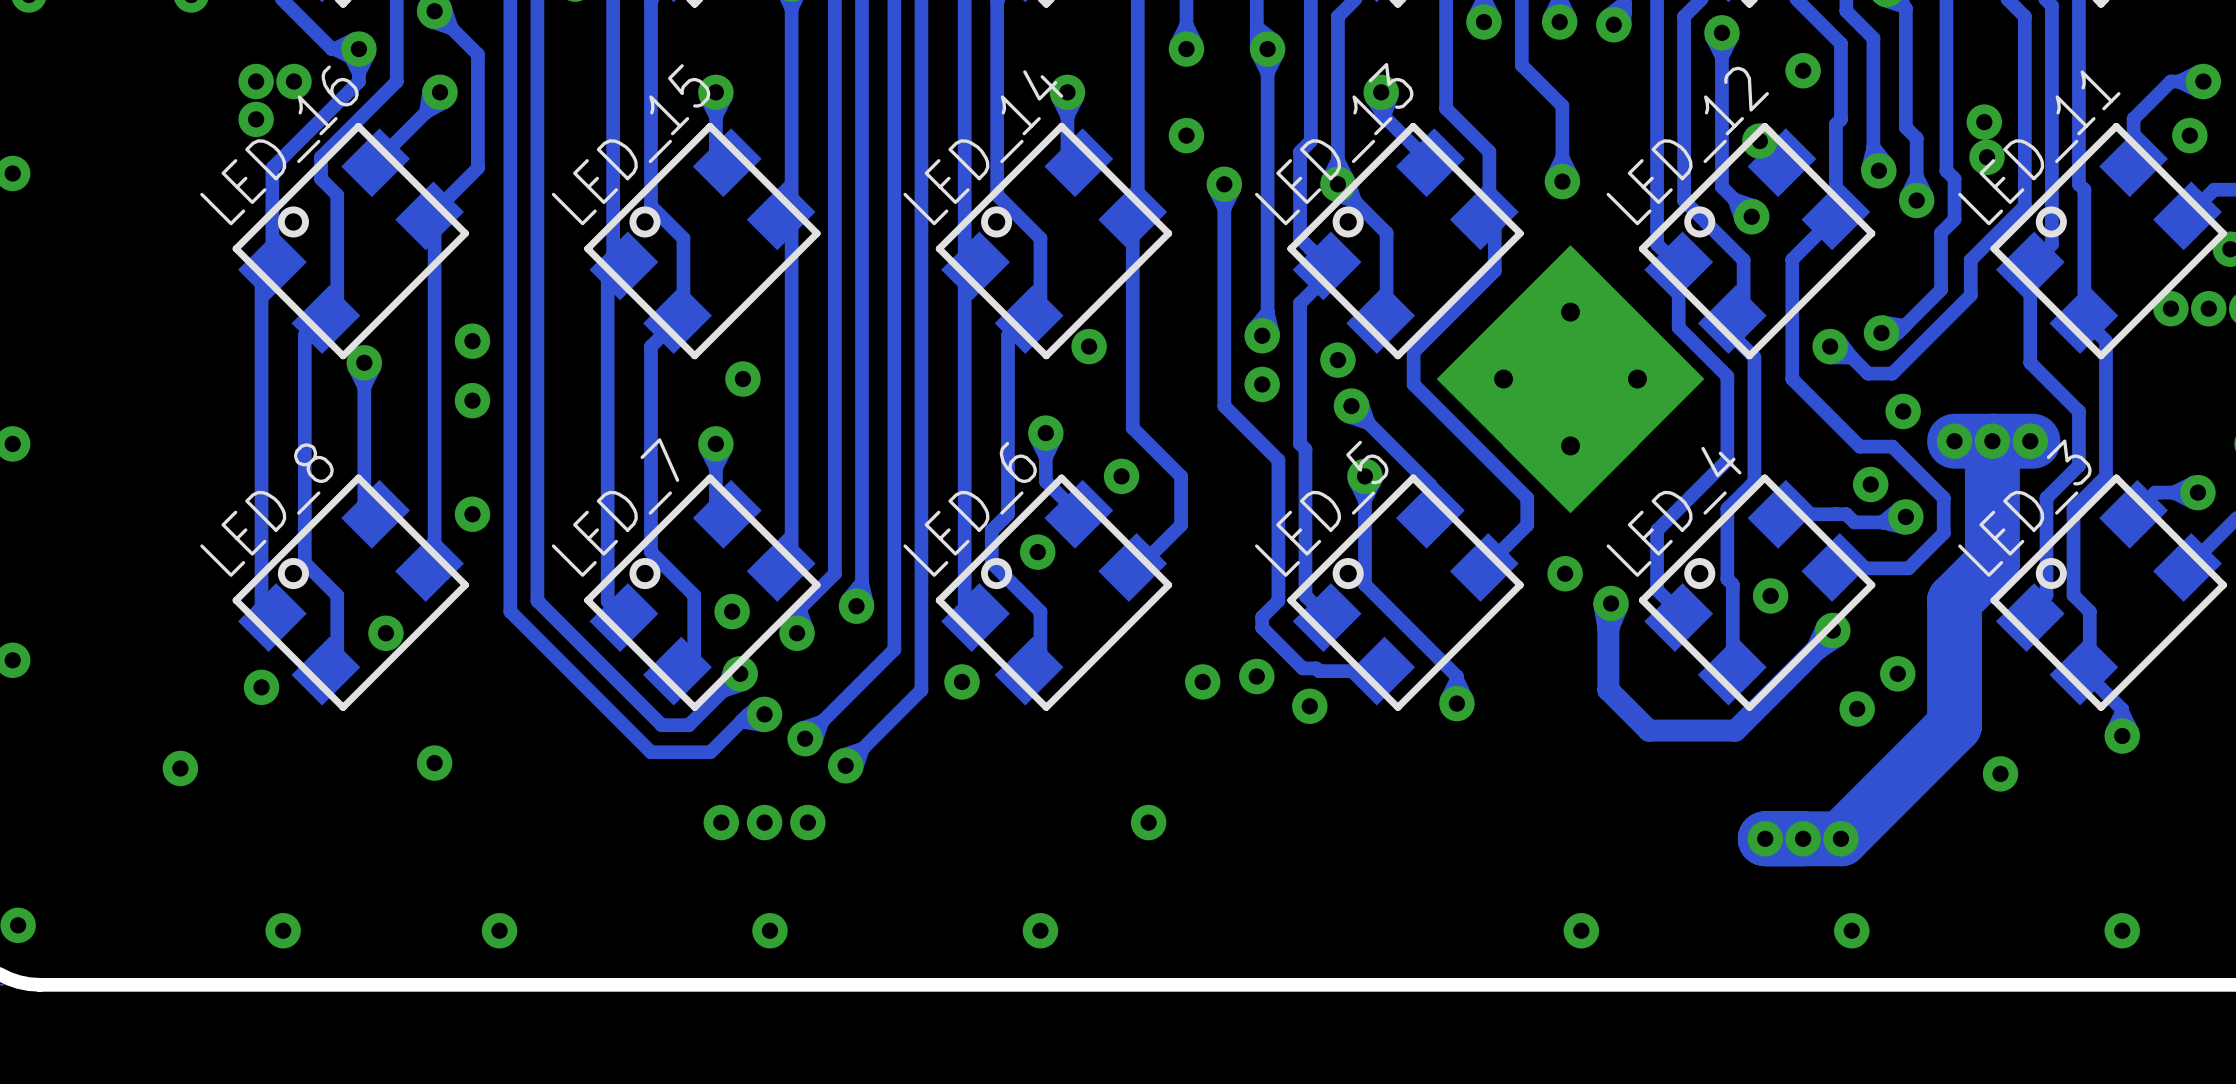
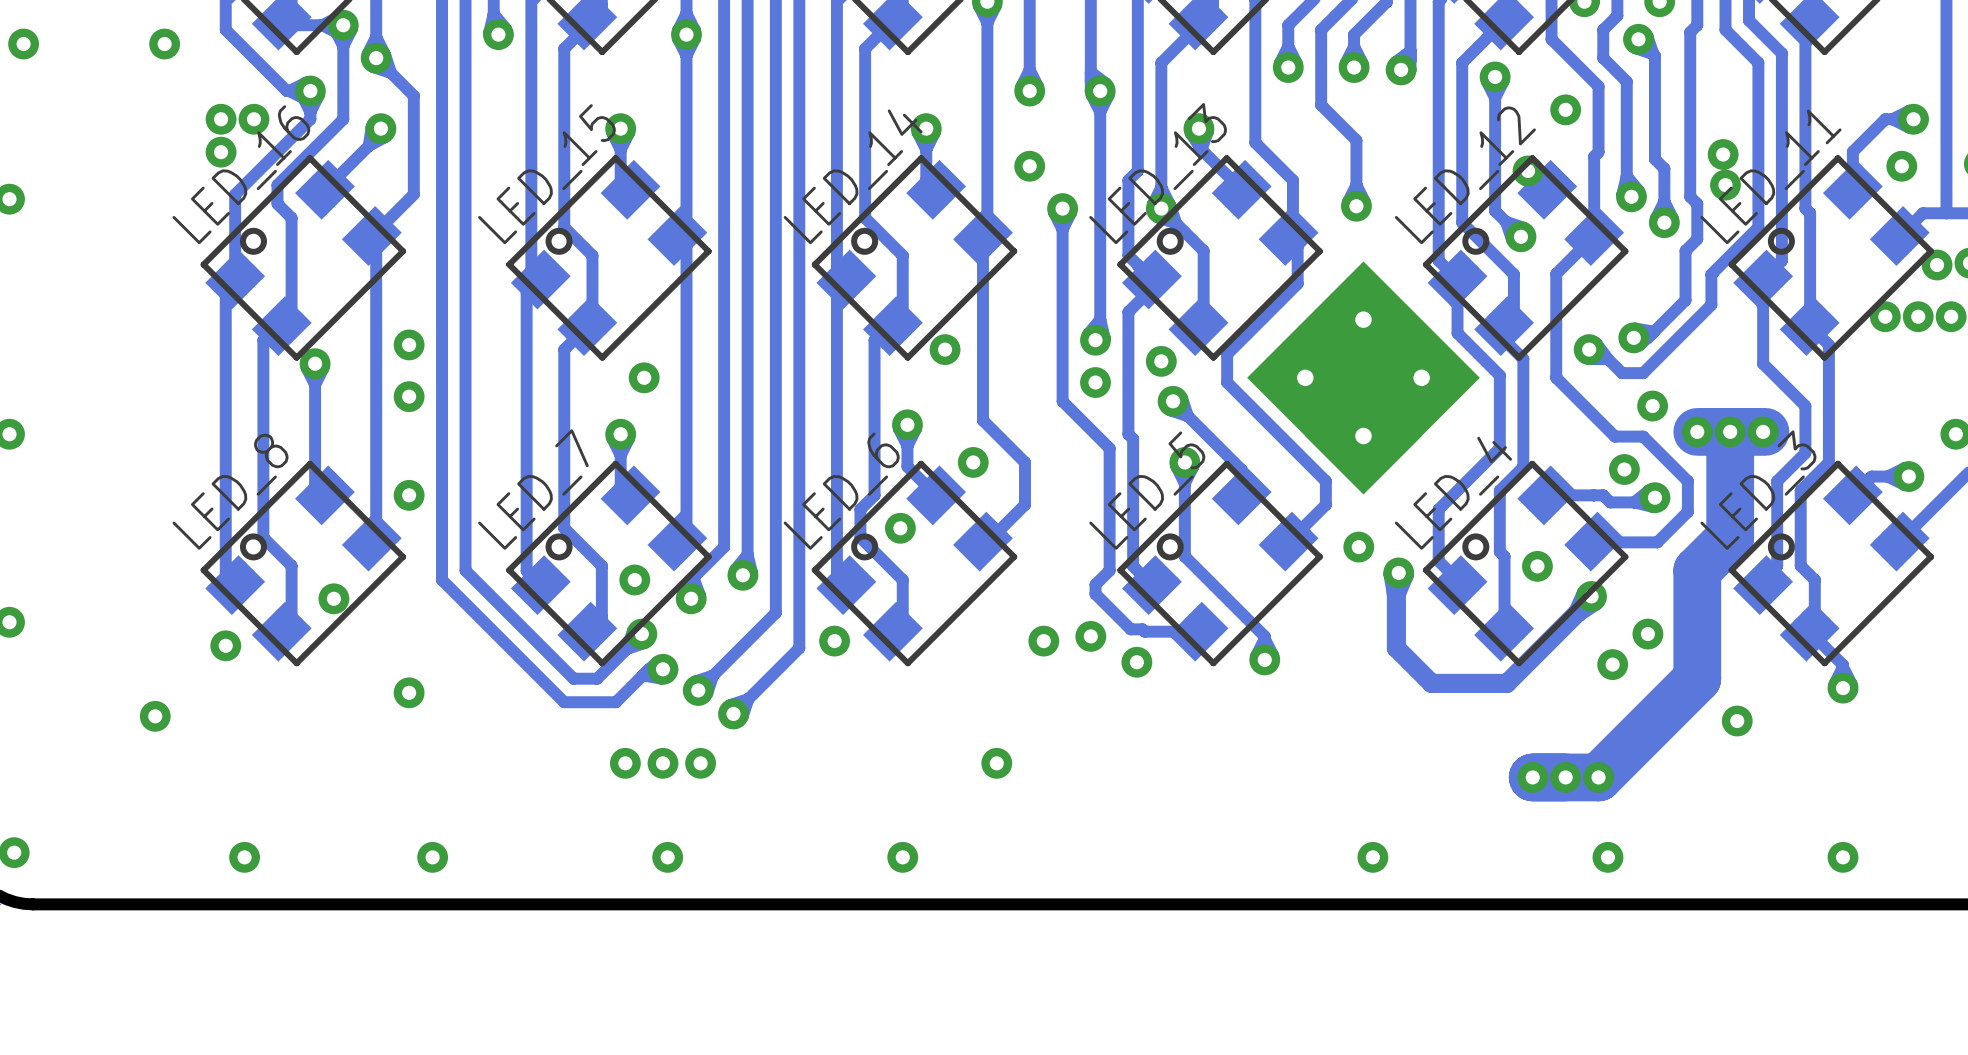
via position: (434, 763) -> (409, 692)

